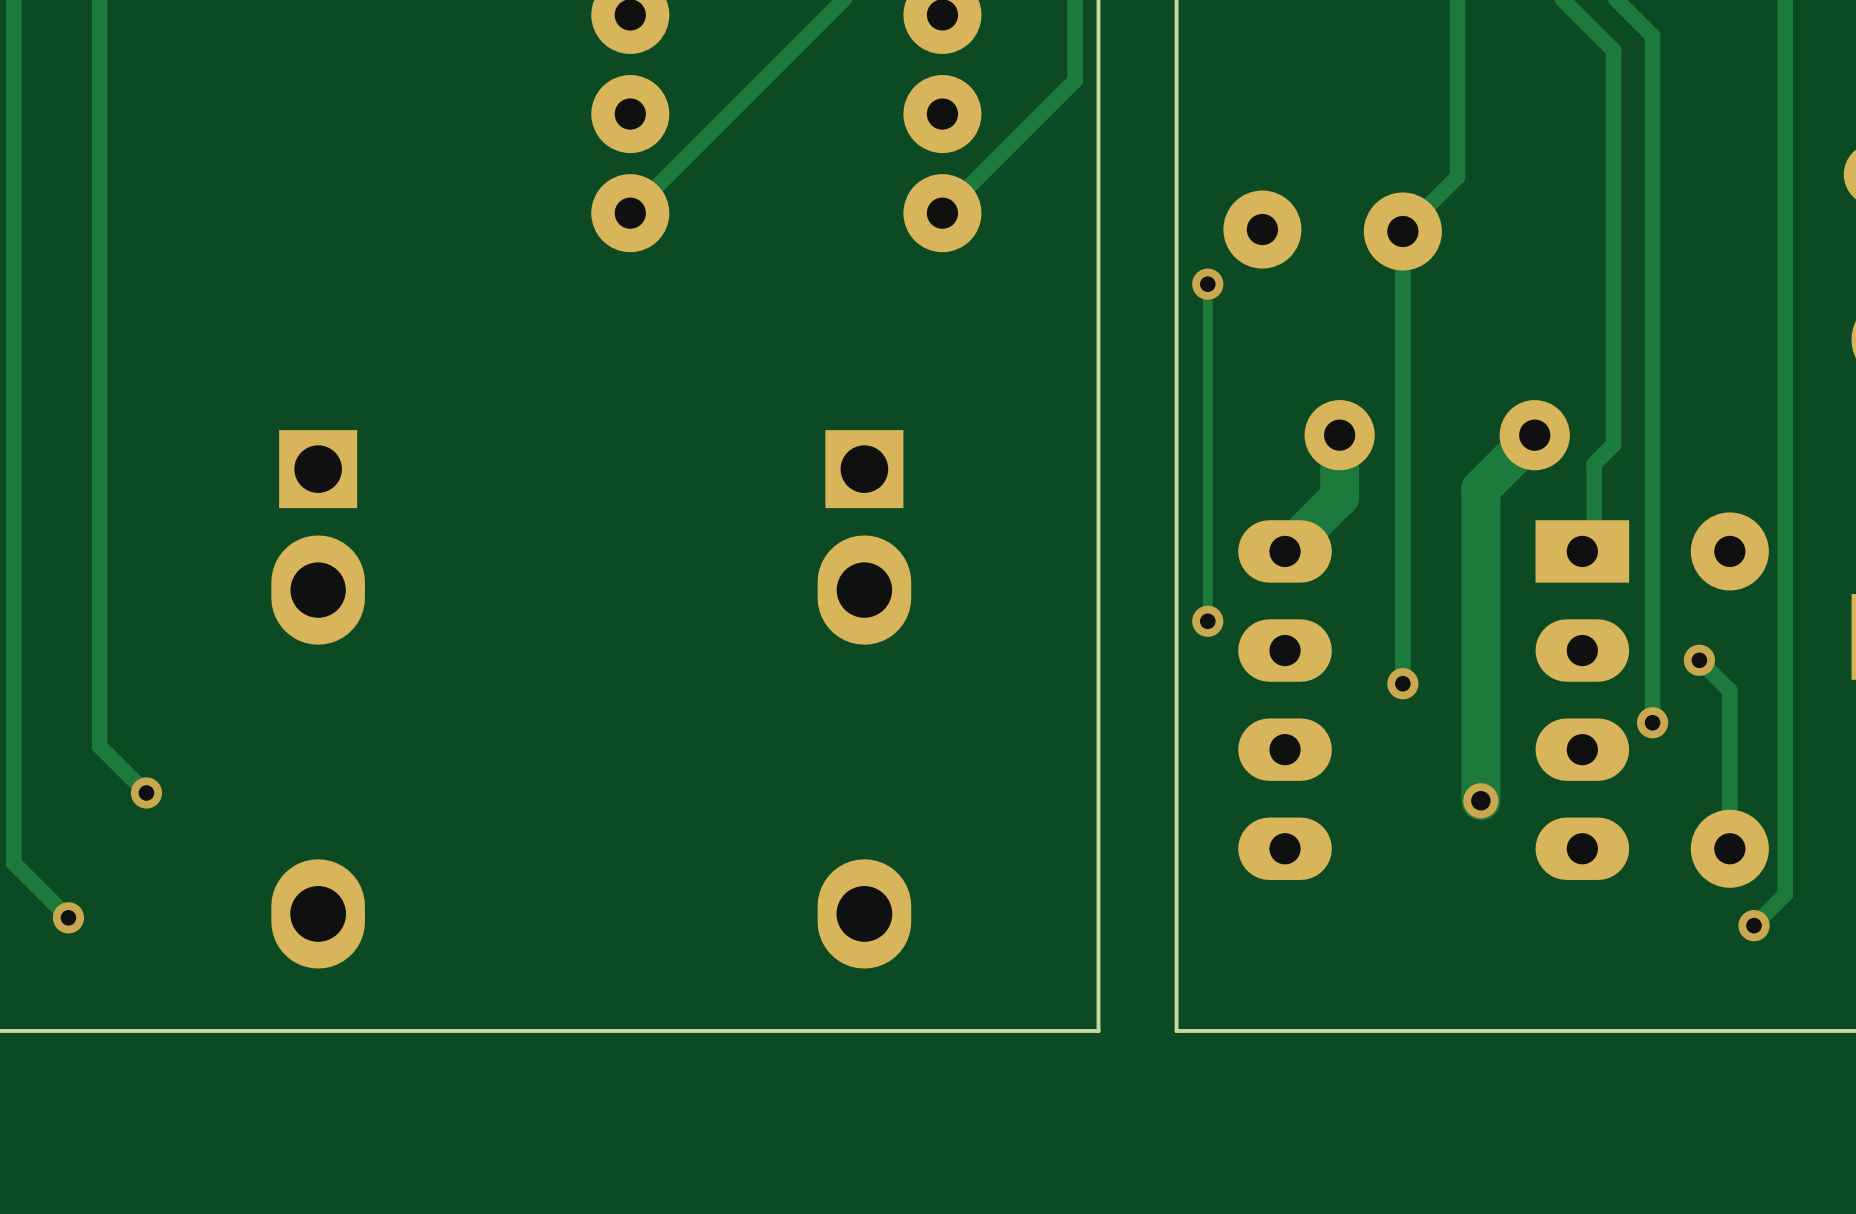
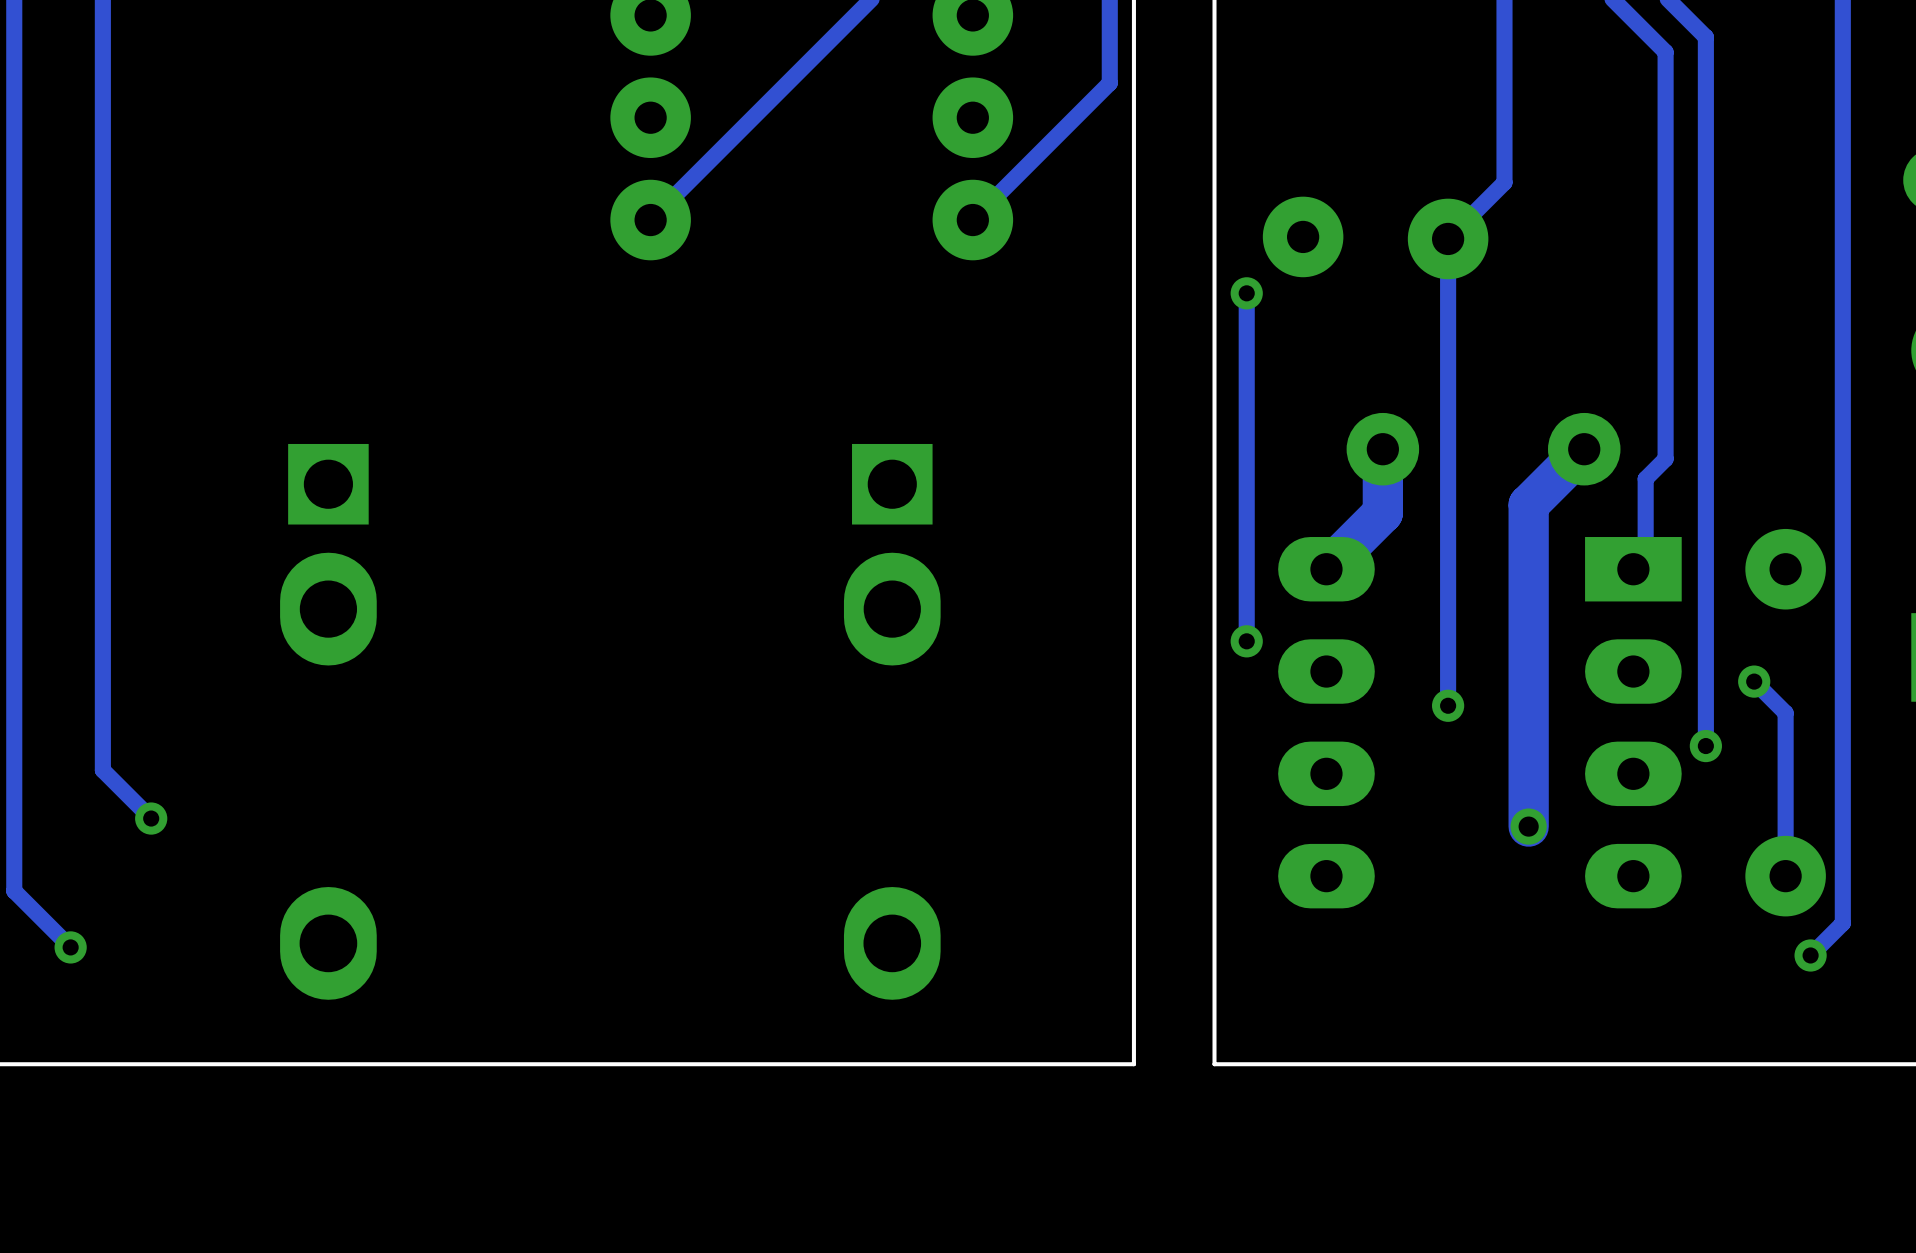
track width: thin (1207, 284) (1207, 621) -> thick (1246, 293) (1246, 641)

